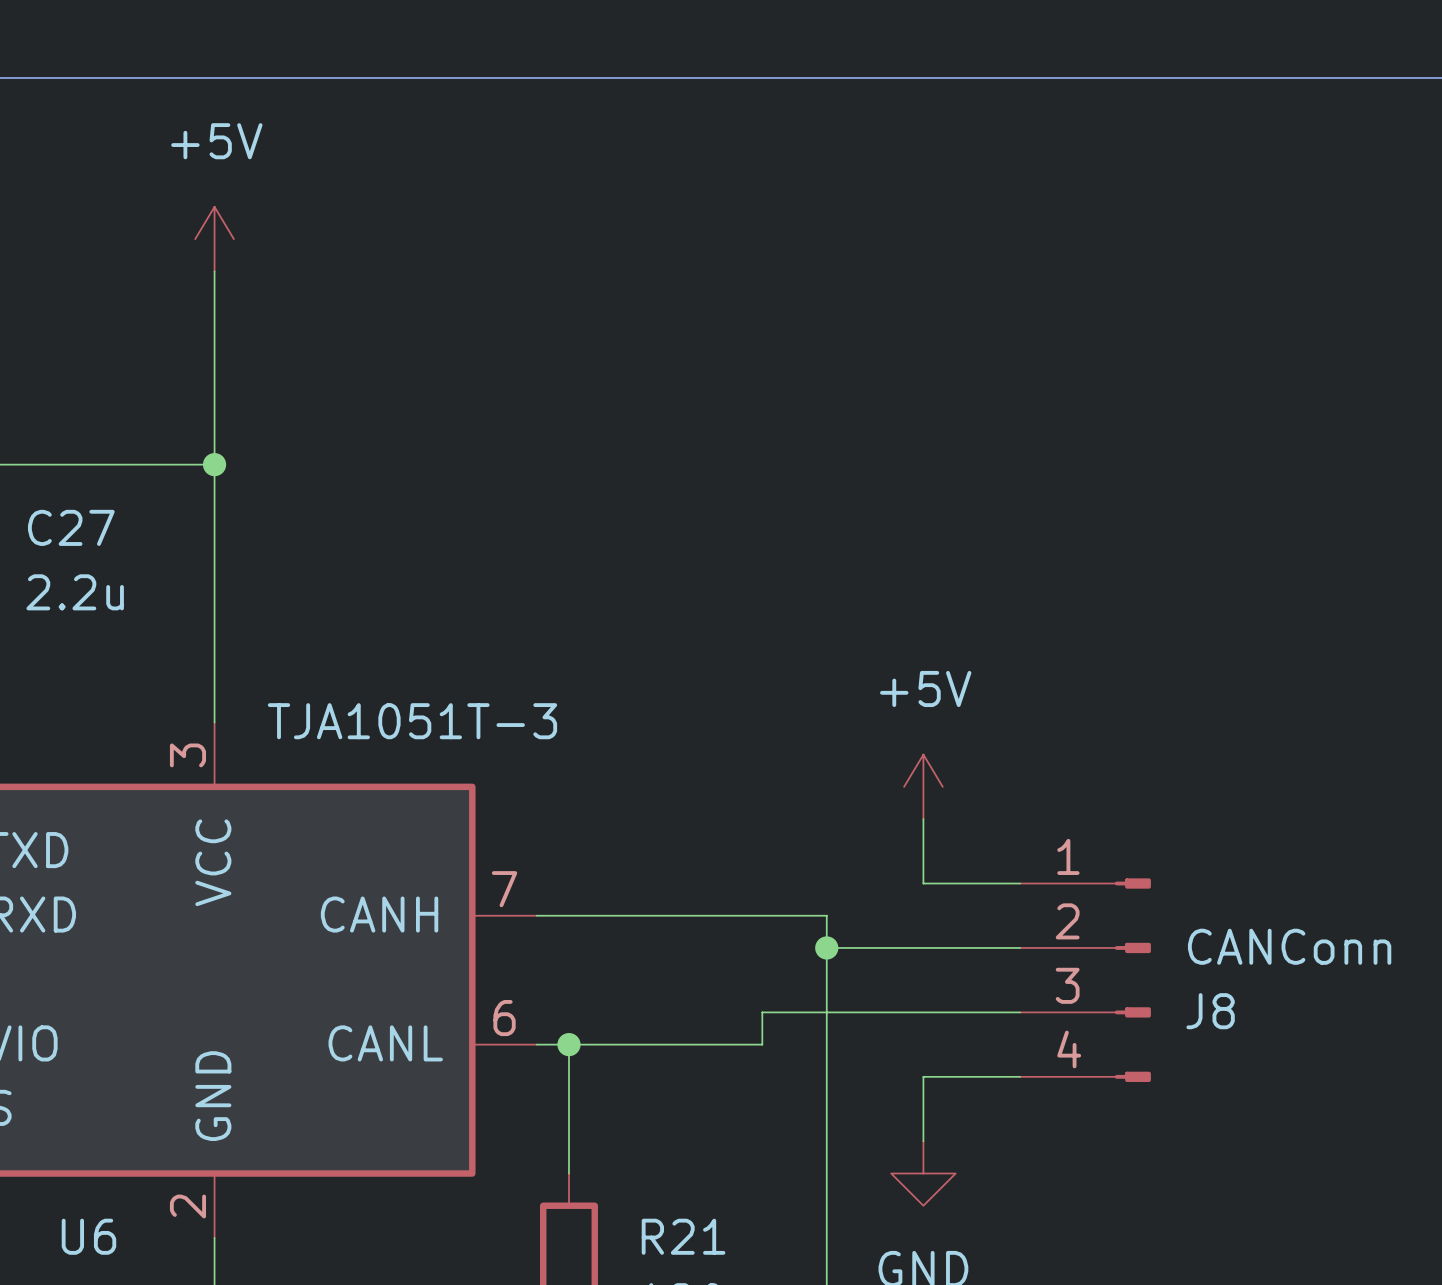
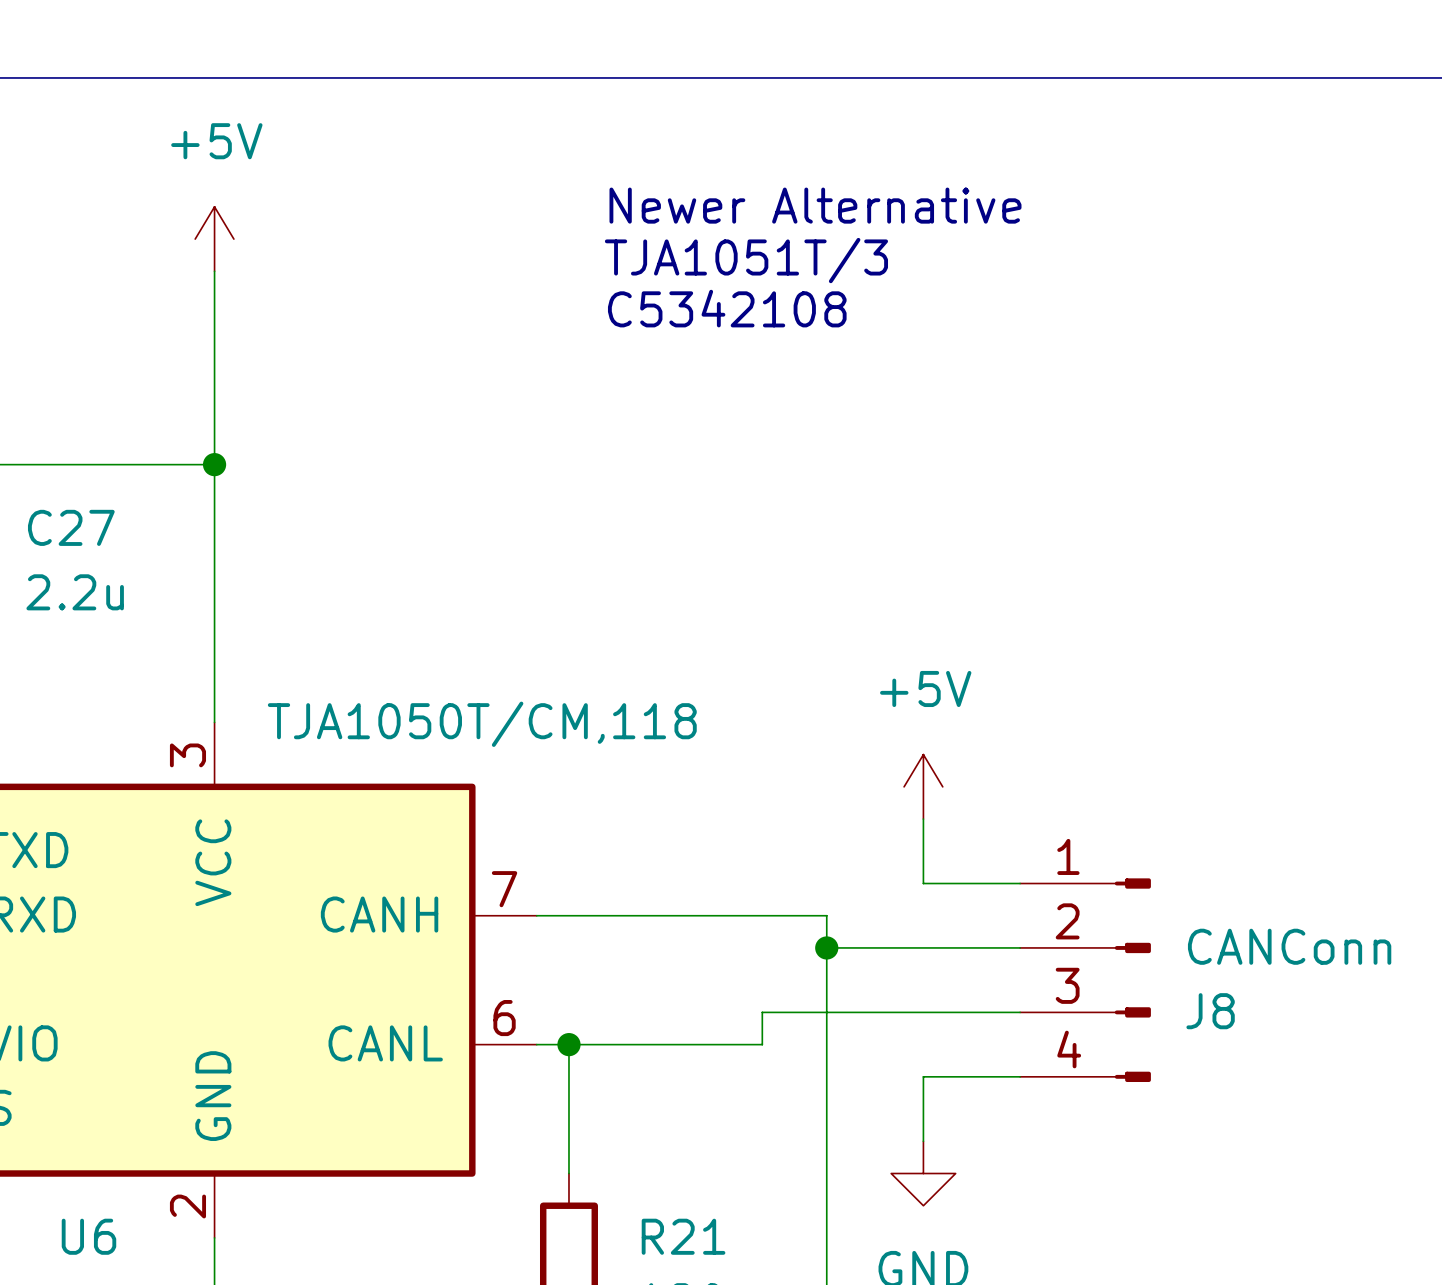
text: none -> Newer Alternative (815, 205)
text: none -> TJA1051T/3 (746, 260)
text: none -> C5342108 (727, 308)
U6 value: TJA1051T-3 (412, 721) -> TJA1050T/CM,118 (482, 724)

